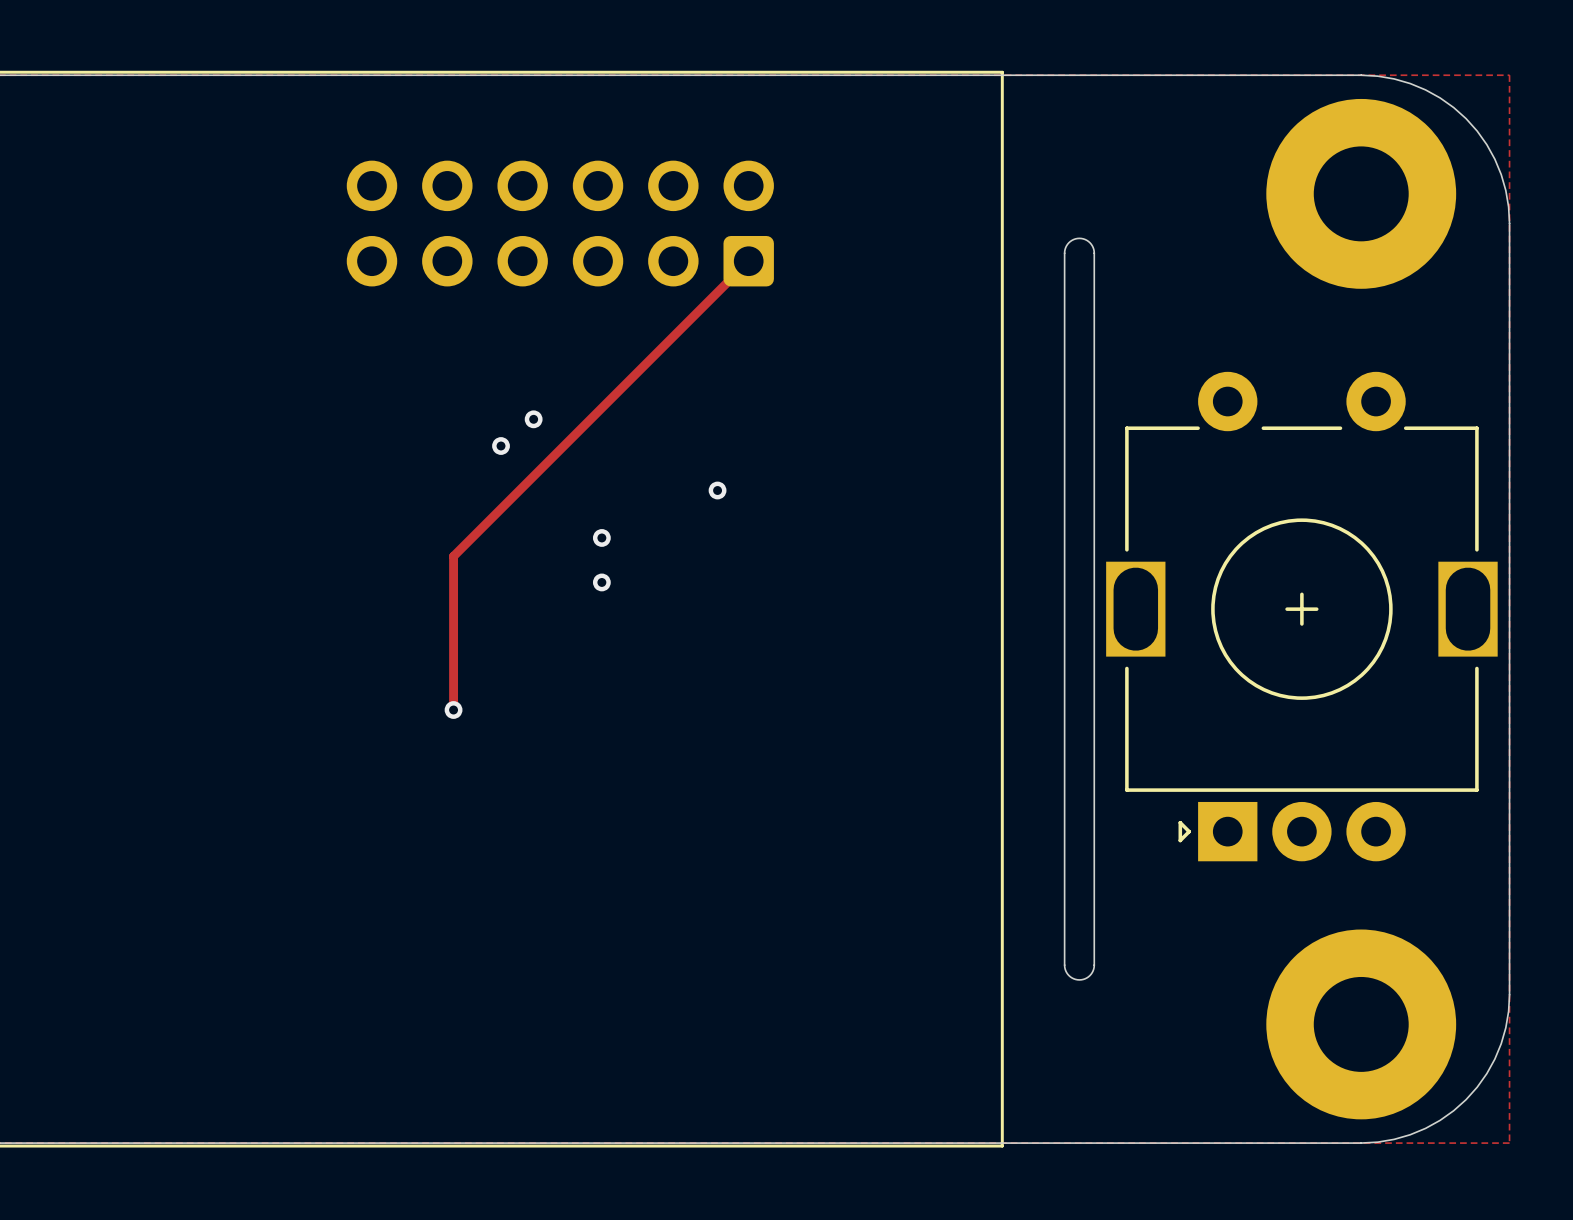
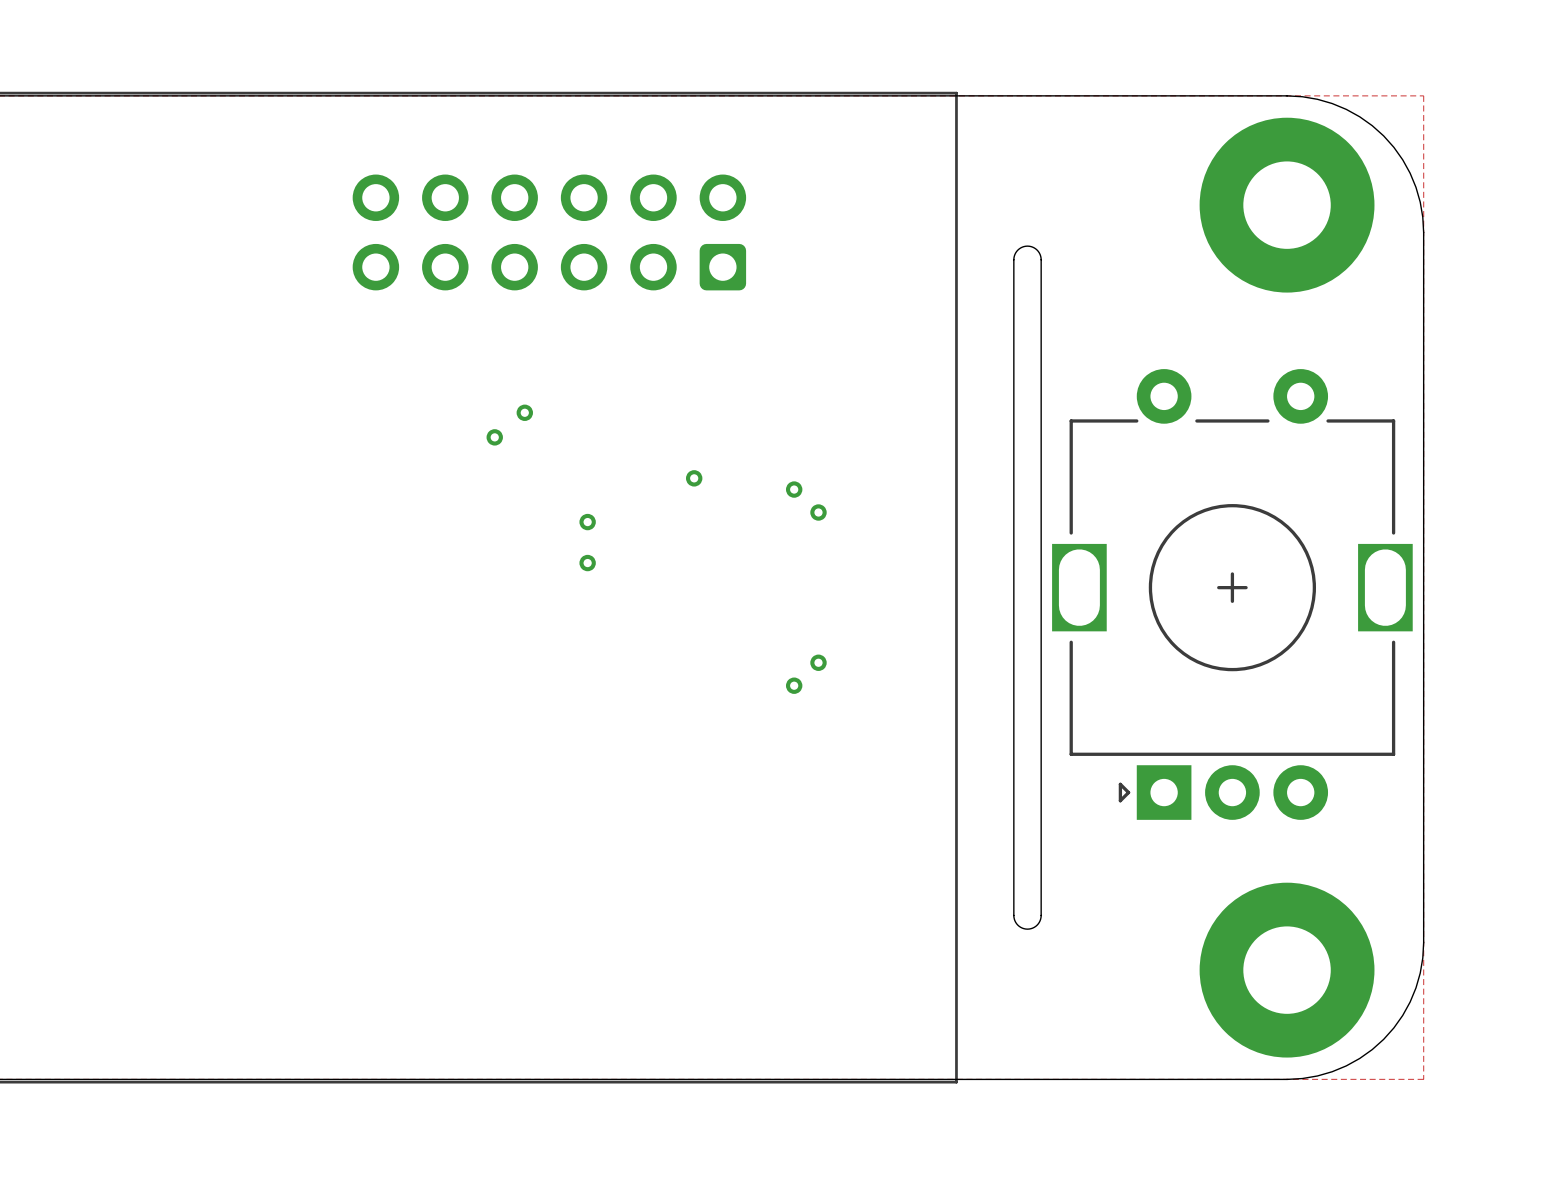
track: (748, 261) (453, 556) (453, 710) -> none
via: none -> (794, 489)
via: none -> (818, 512)
via: none -> (818, 662)
via: (453, 710) -> none
via: none -> (794, 685)

